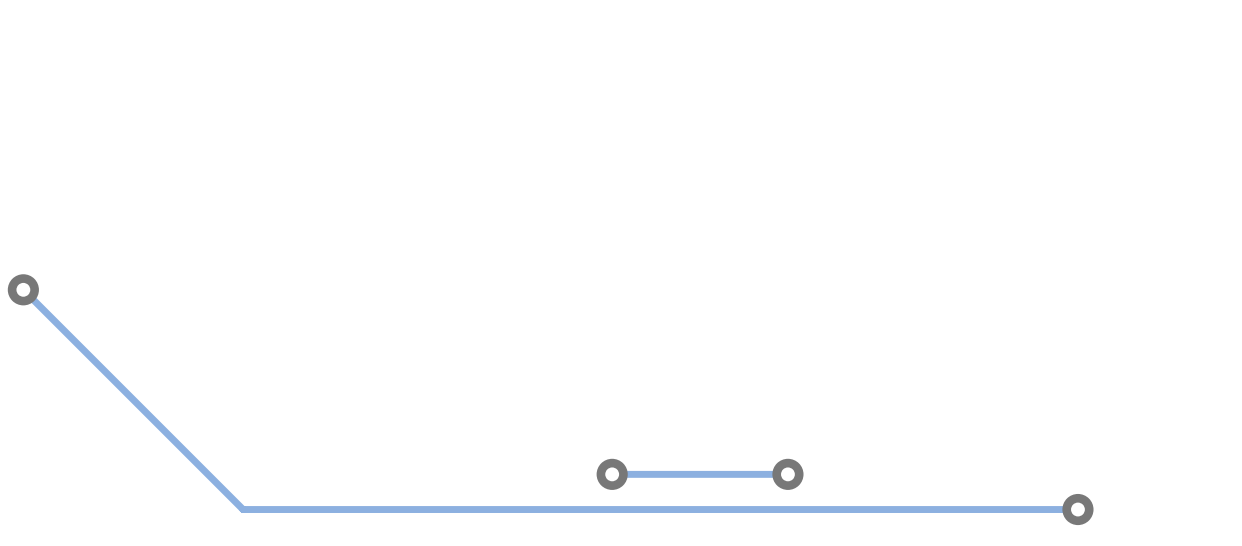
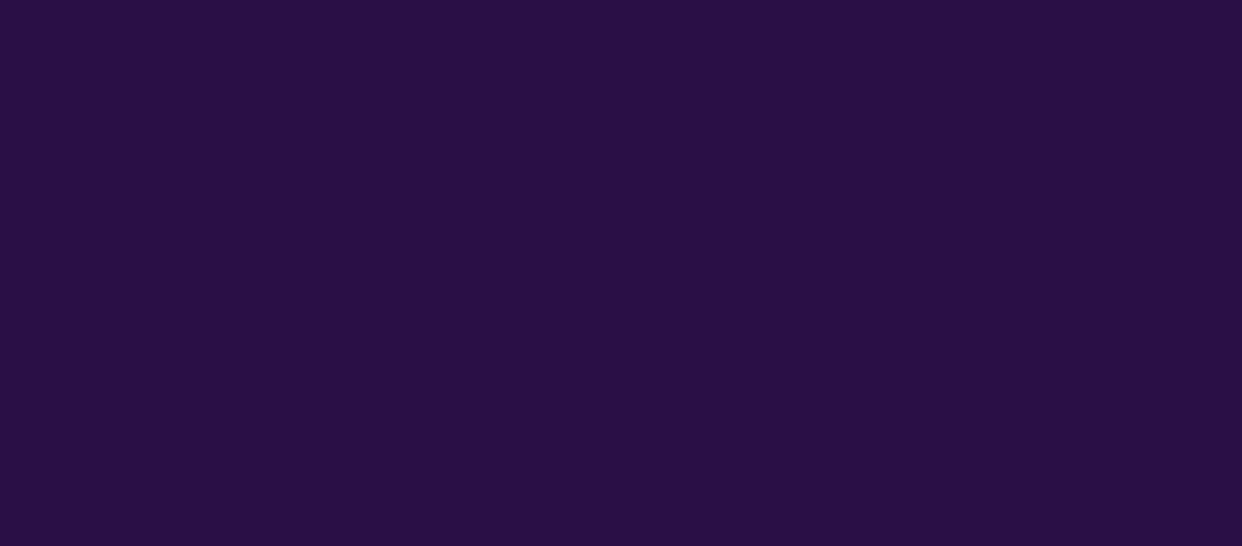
track: (23, 289) (243, 509) (1077, 509) -> none
via: (23, 289) -> none
via: (612, 474) -> none
track: (787, 474) (612, 474) -> none
via: (787, 474) -> none
via: (1077, 509) -> none

